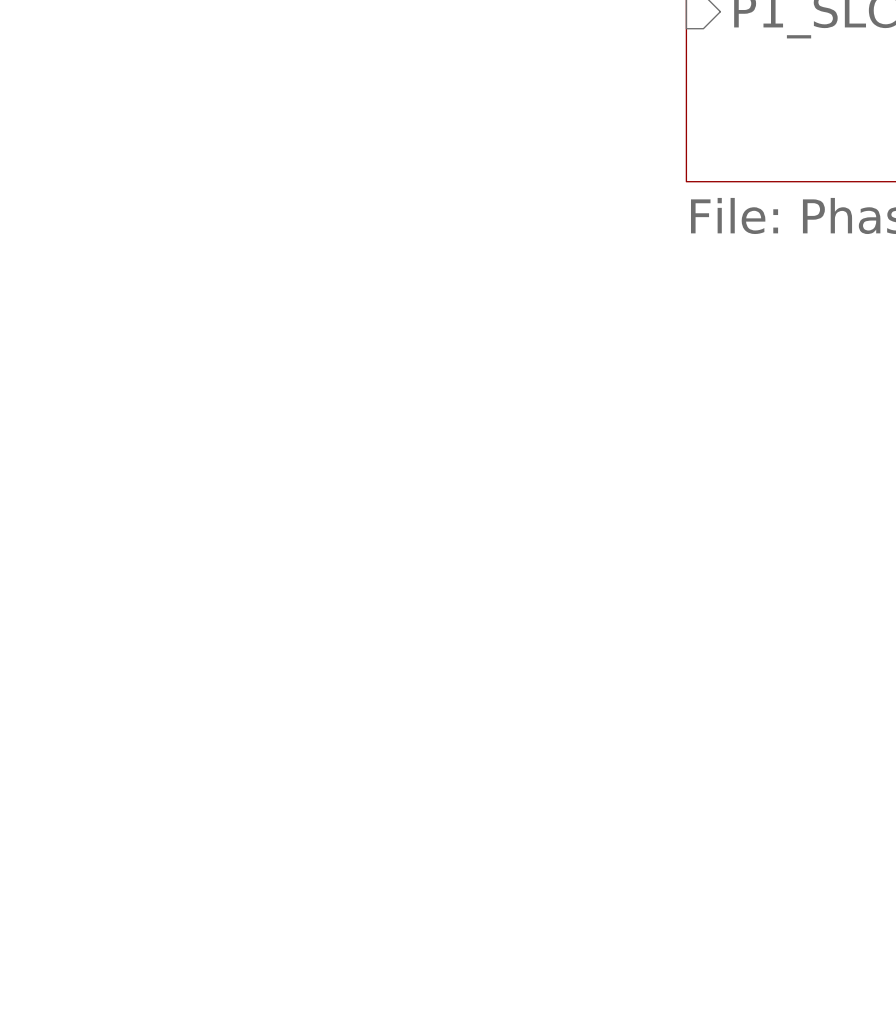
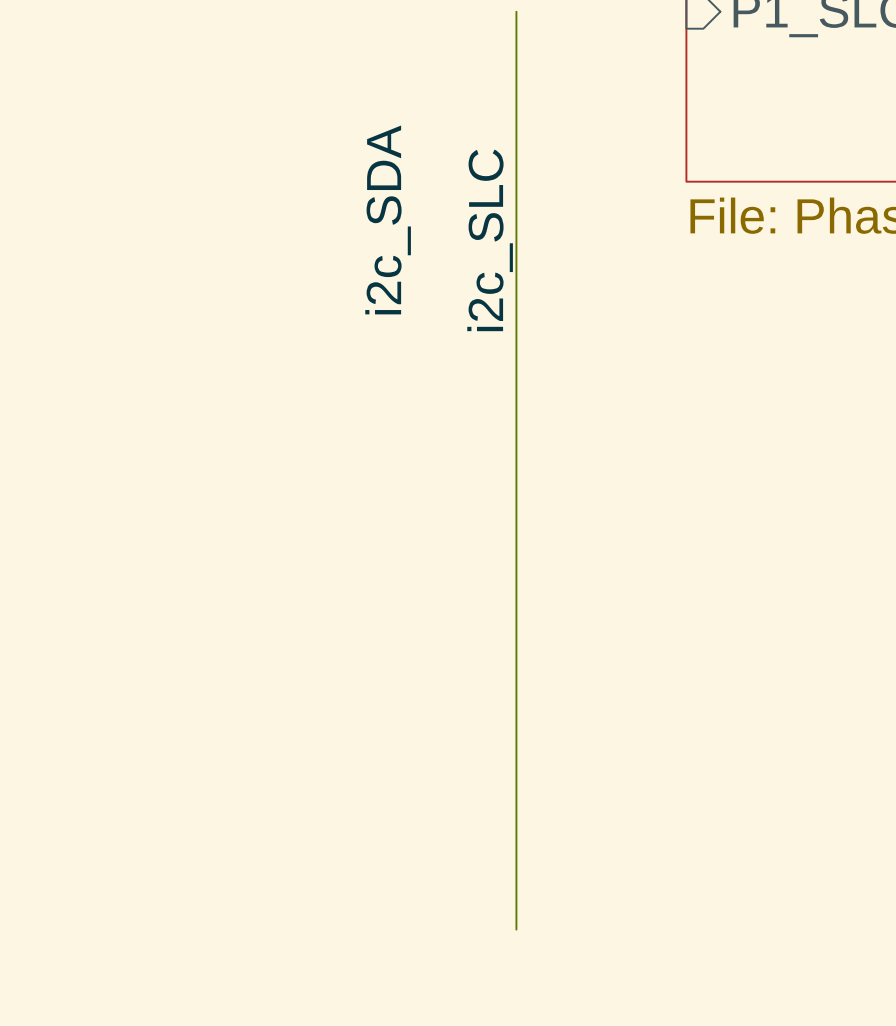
wire: none -> (516, 11) (516, 929)
label: none -> i2c_SDA (388, 219)
label: none -> i2c_SLC (490, 240)

